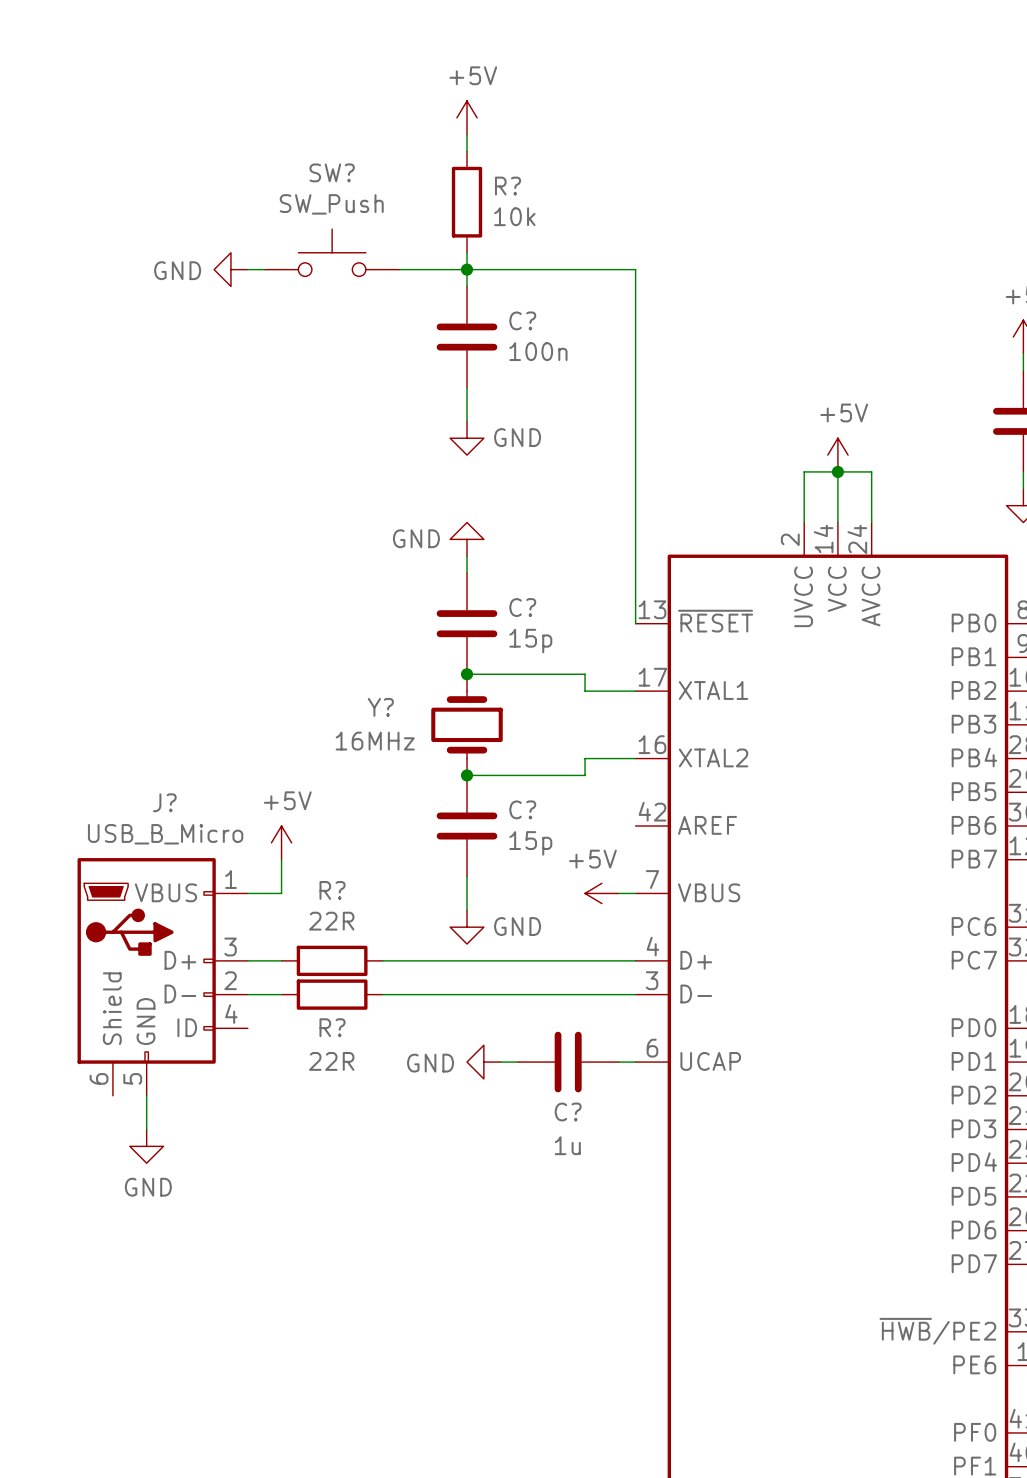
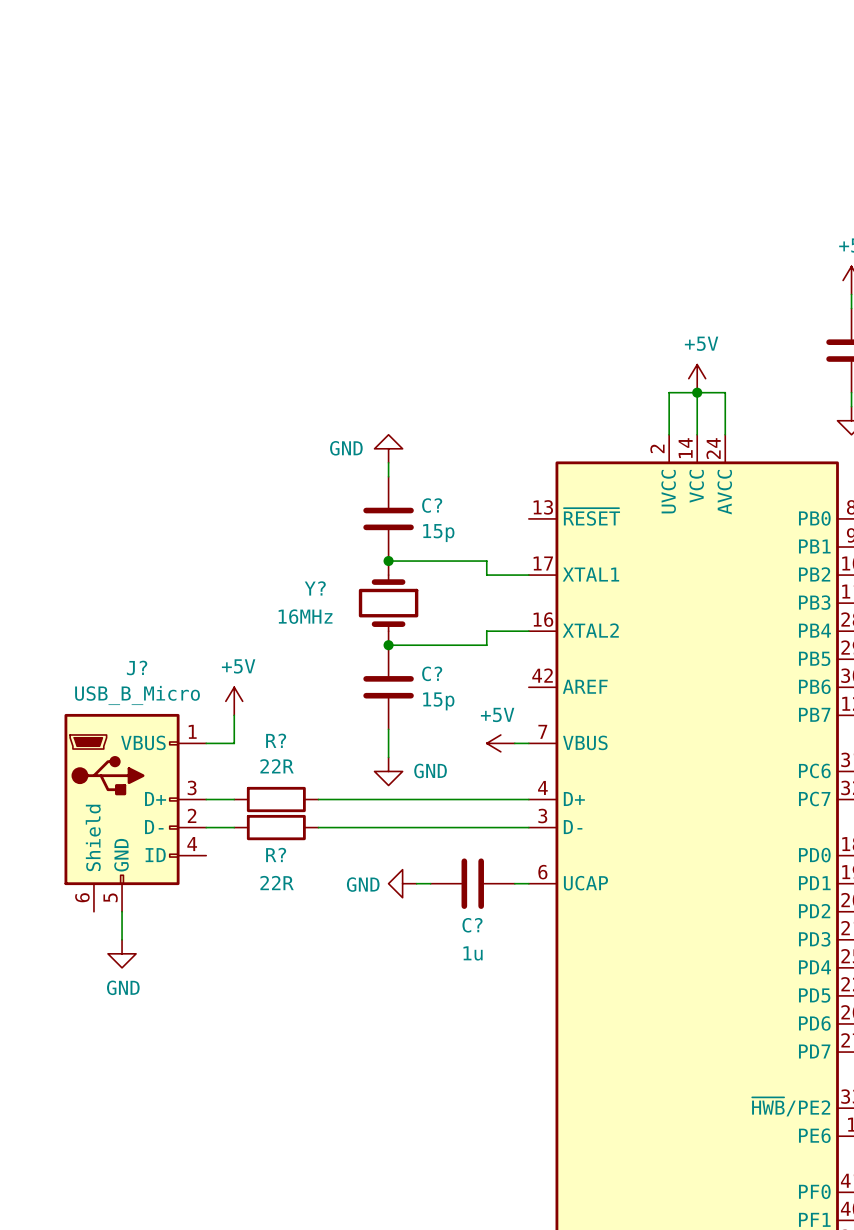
power symbol: +5V (467, 117) -> none
wire: (467, 134) (467, 151) -> none
R?: 10k (467, 202) -> none
SW?: SW_Push (332, 252) -> none
wire: (467, 252) (467, 286) -> none
power symbol: GND (230, 269) -> none
wire: (247, 269) (264, 269) -> none
wire: (399, 269) (635, 269) (635, 623) -> none
junction: (467, 269) -> none
C?: 100n (467, 337) -> none
wire: (467, 387) (467, 421) -> none
power symbol: GND (467, 438) -> none

